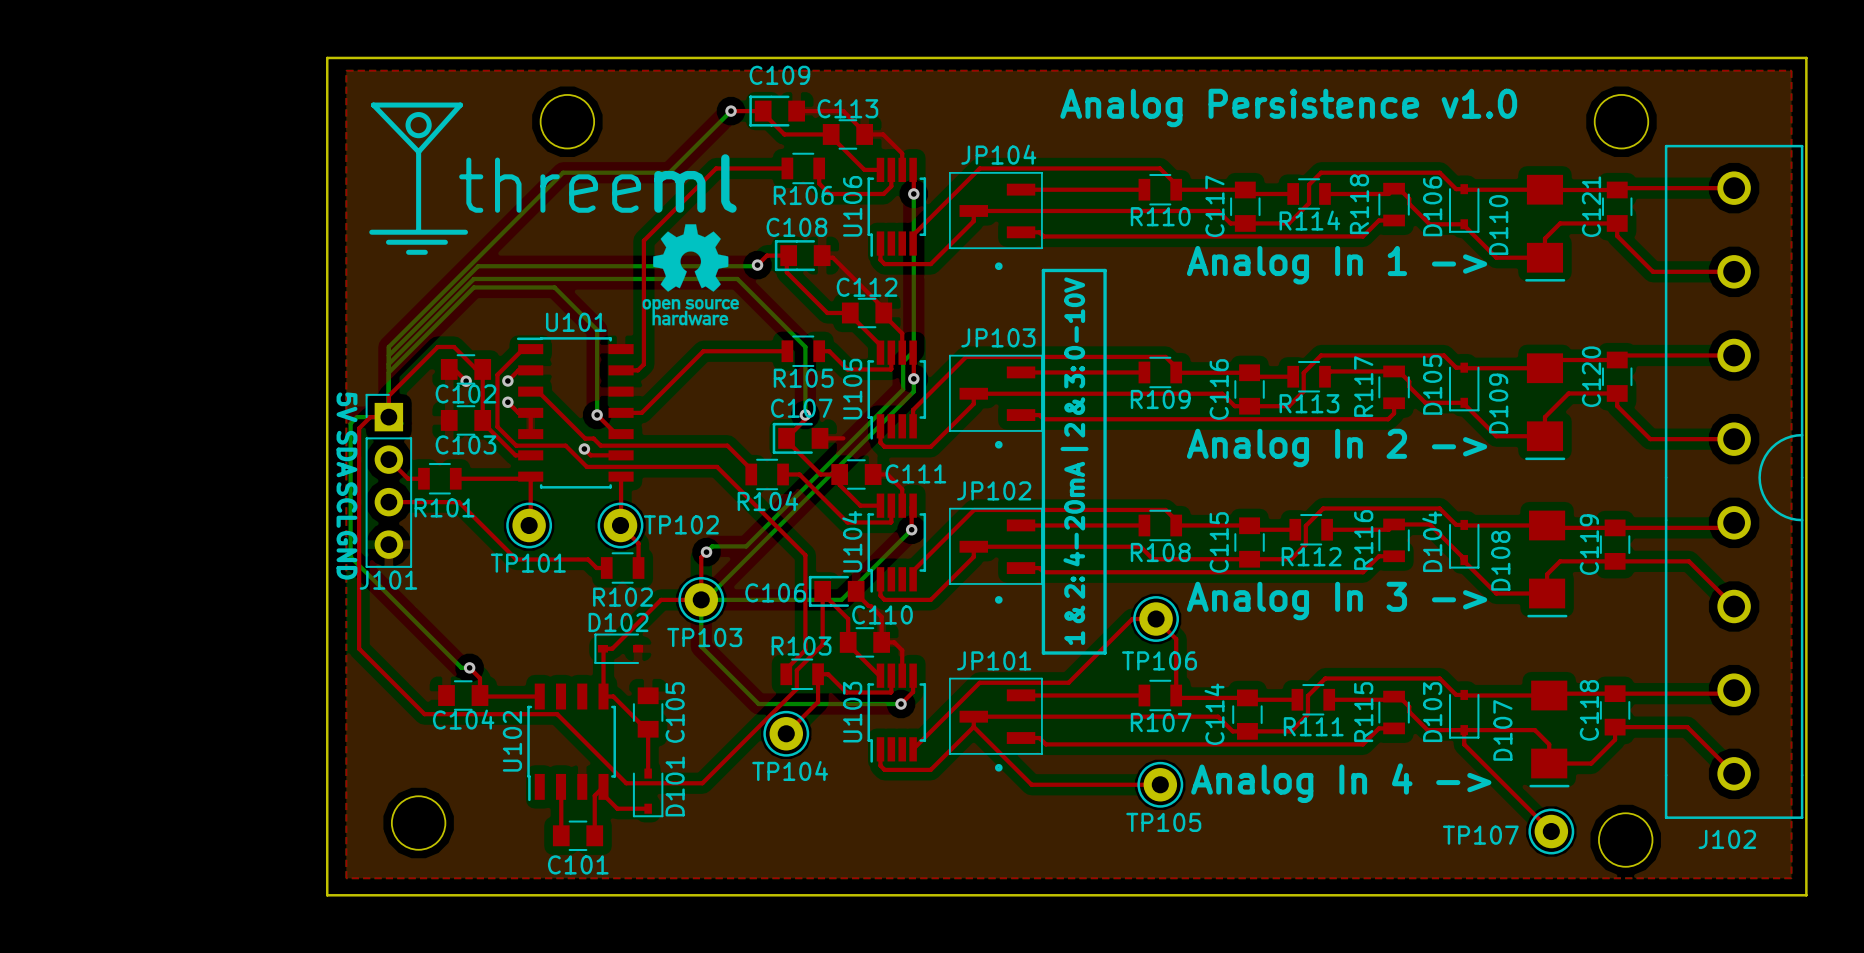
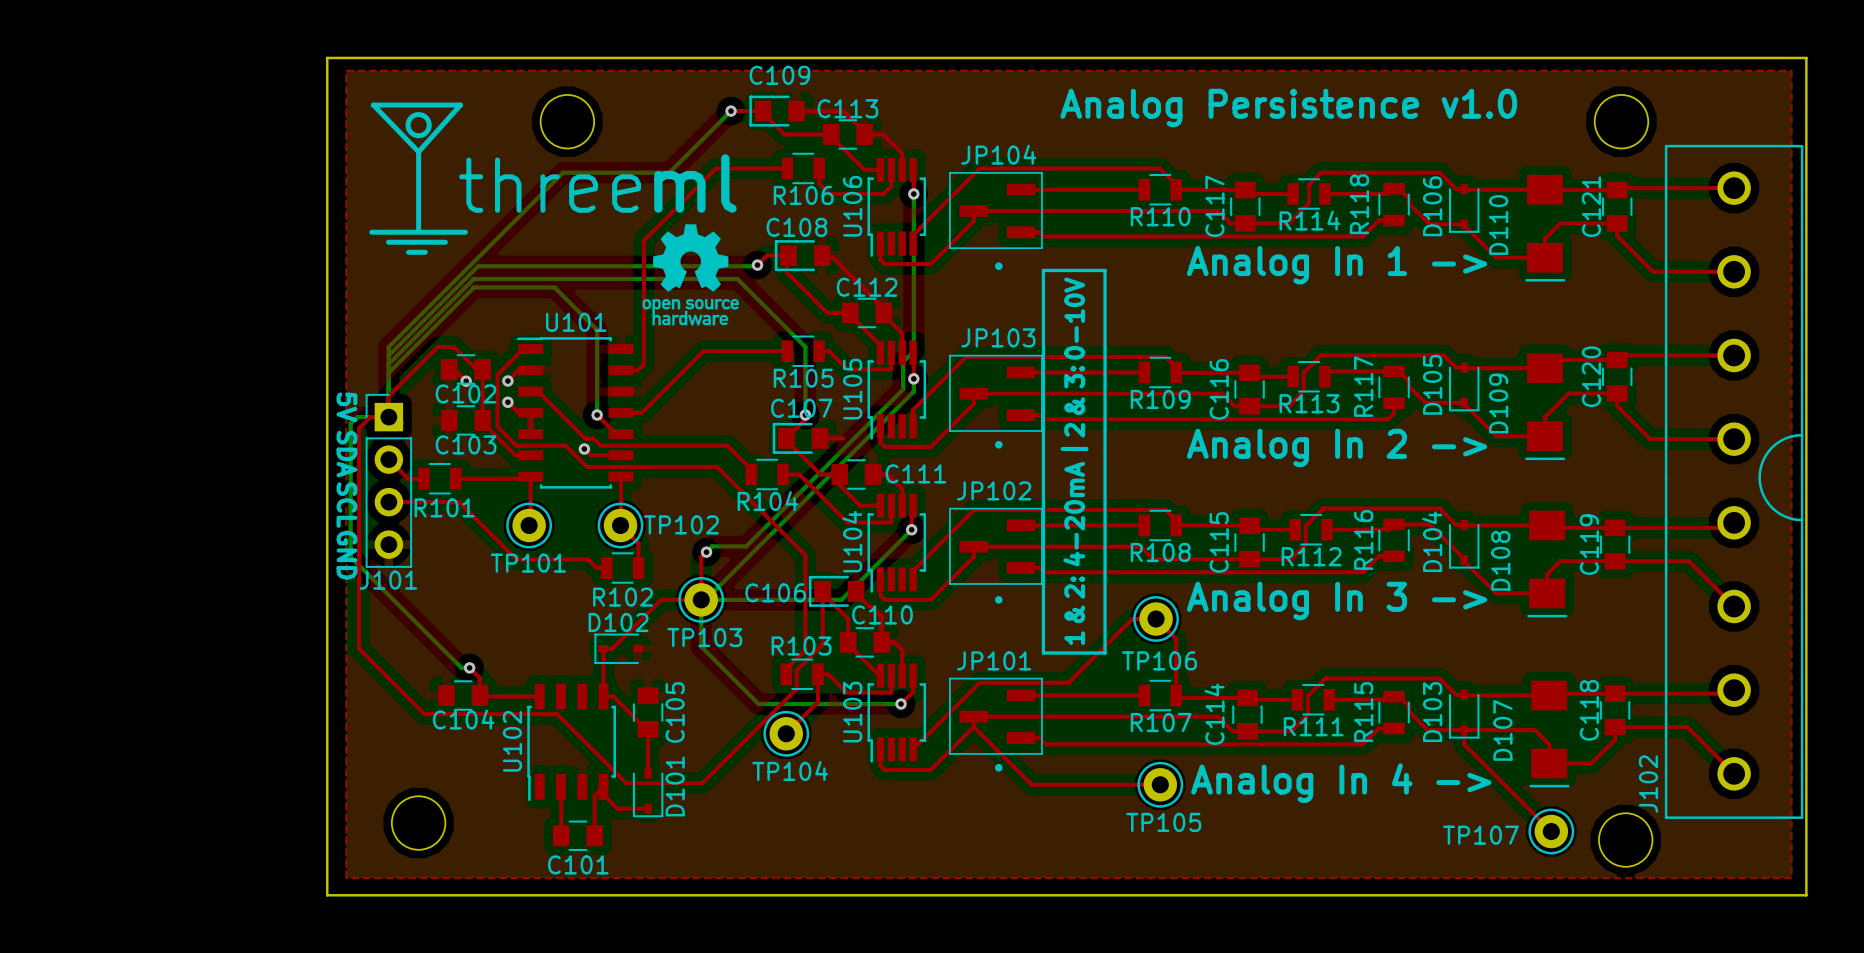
J102 name rotation: 0° (1727, 839) -> 90° counterclockwise (1648, 784)
J102 name position: J102 (1727, 839) -> J102 (1648, 784)

